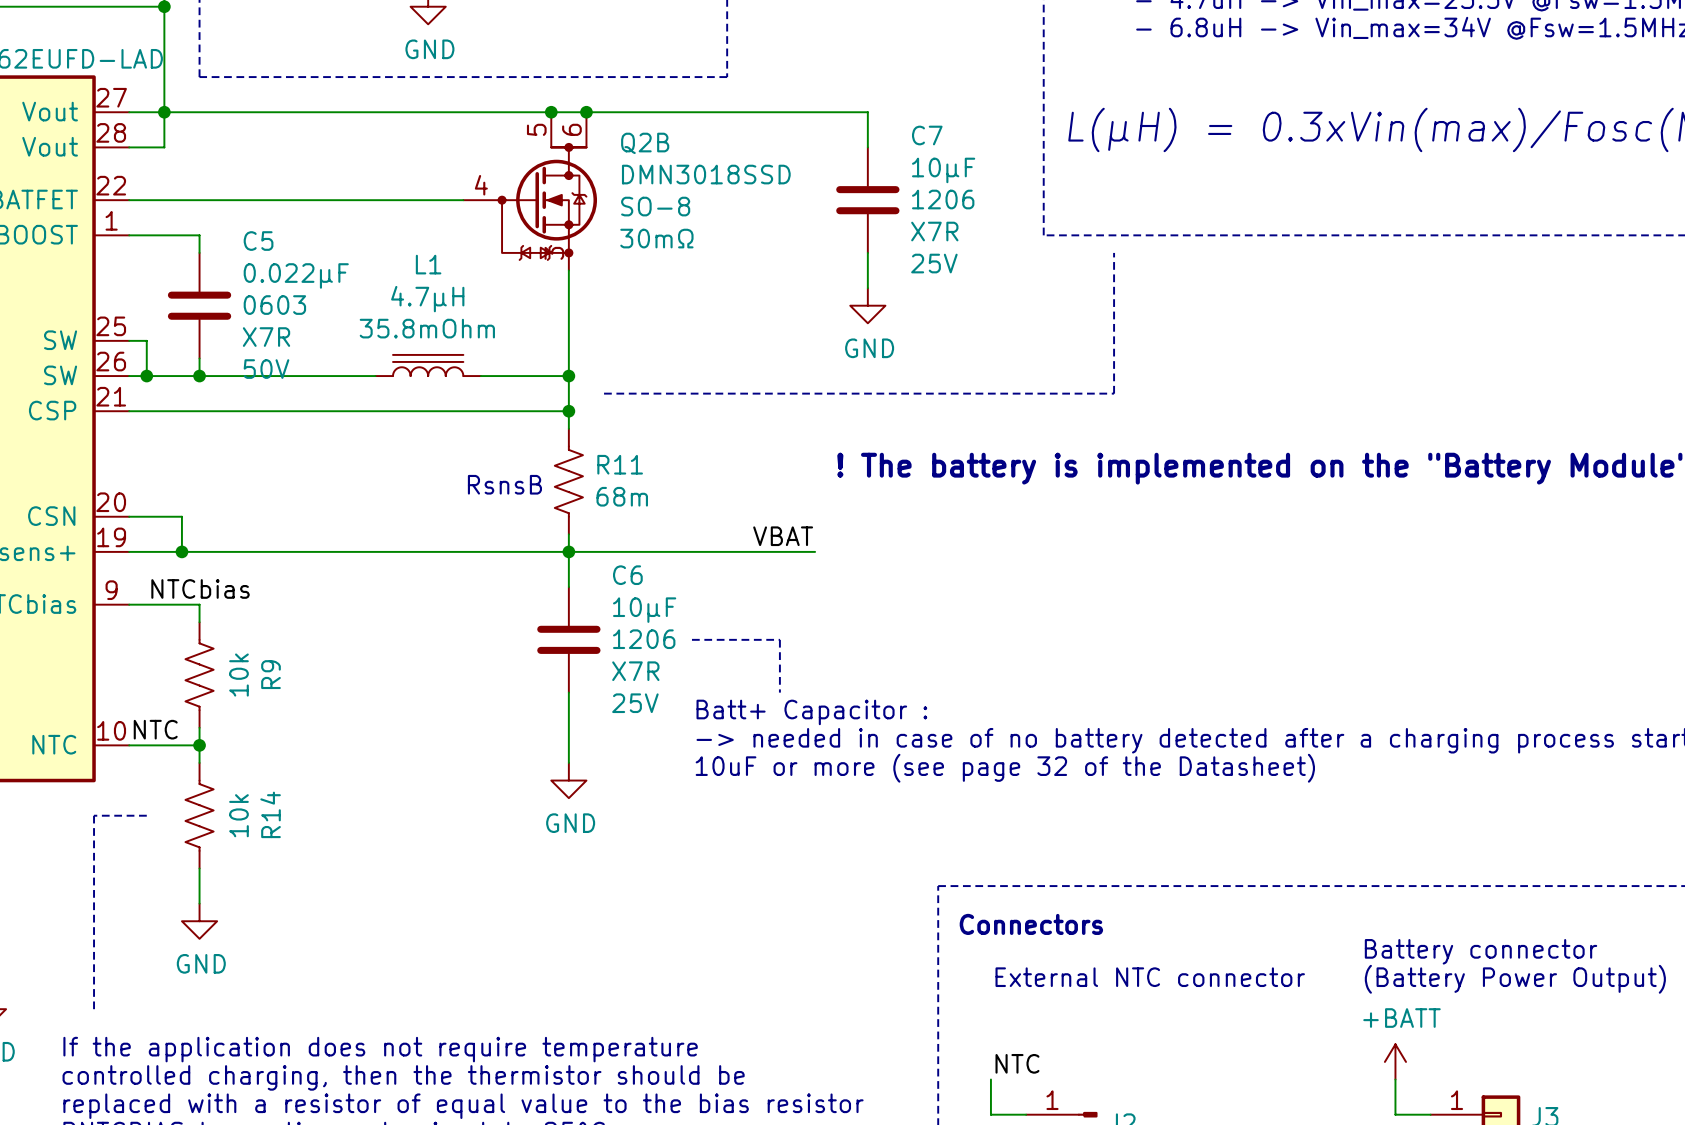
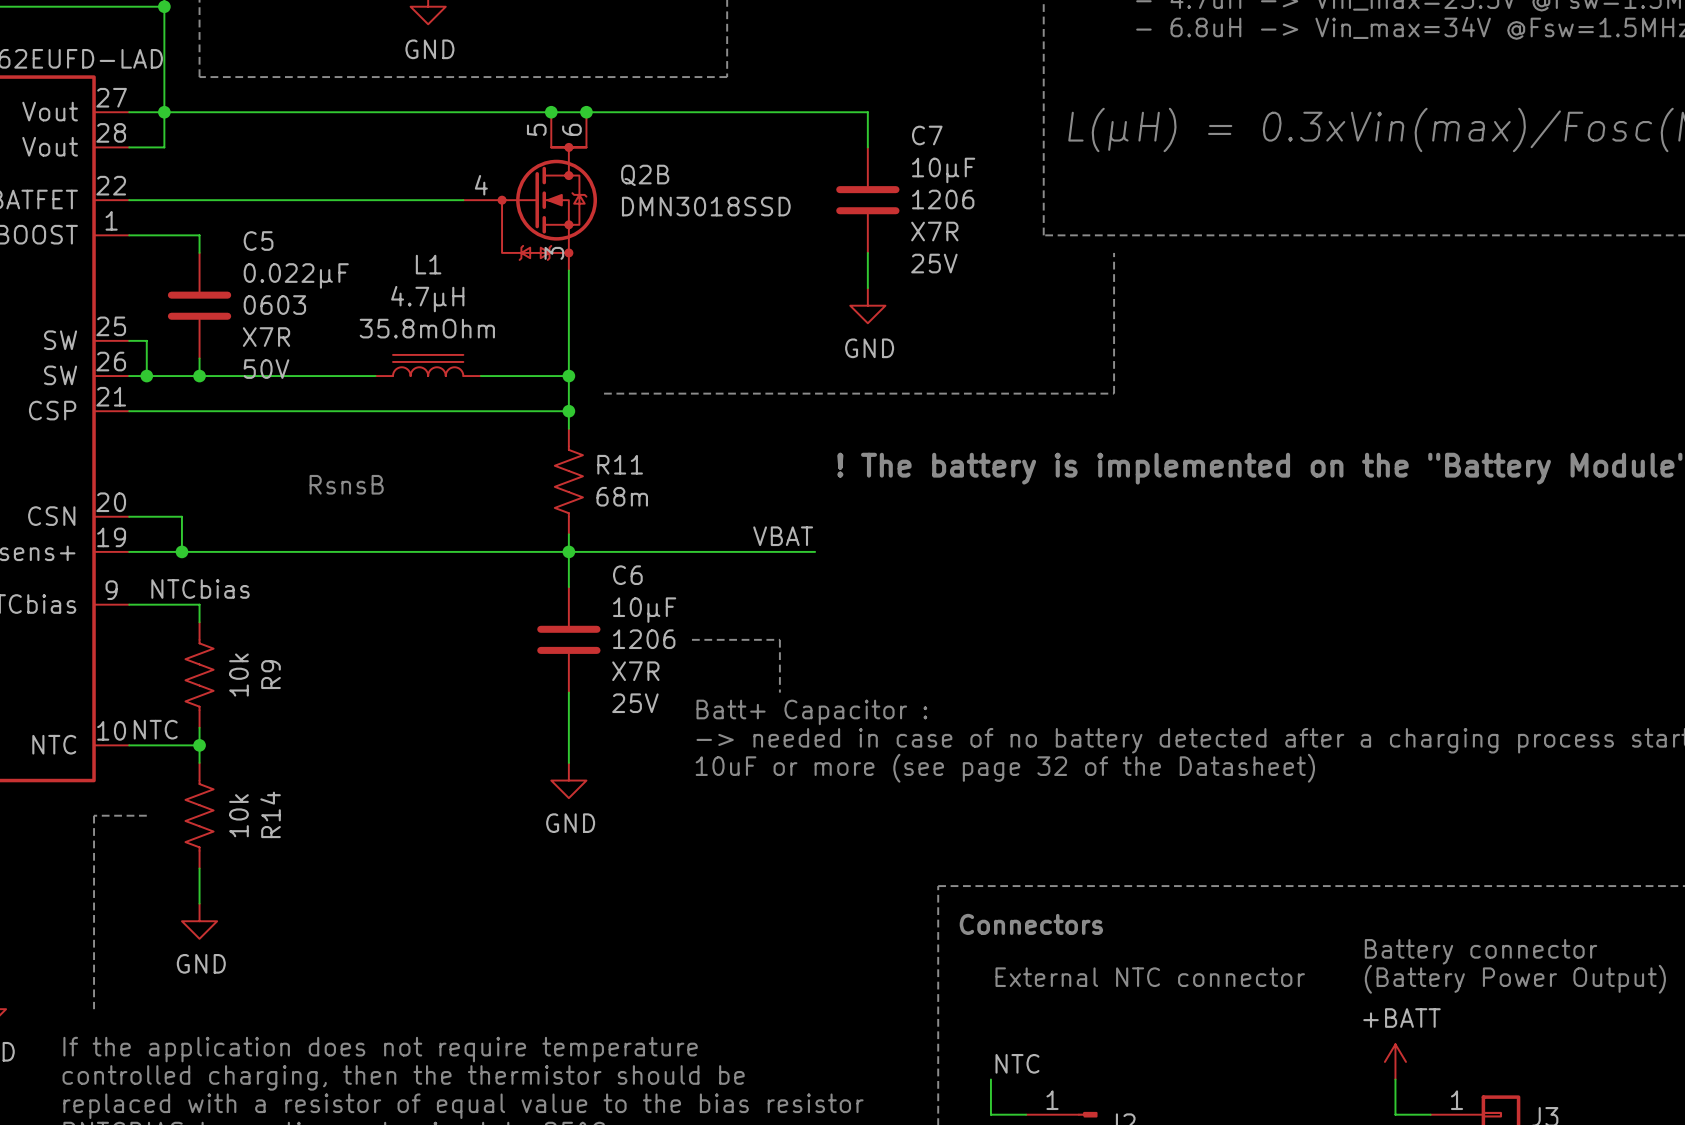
Q2B name position: Q2B (645, 143) -> Q2B (645, 175)
Q2B value position: DMN3018SSD (706, 174) -> DMN3018SSD (706, 206)
Q2B text: SO-8 (655, 206) -> none
Q2B text: 30mΩ (656, 238) -> none
text position: RsnsB (504, 484) -> RsnsB (346, 484)

